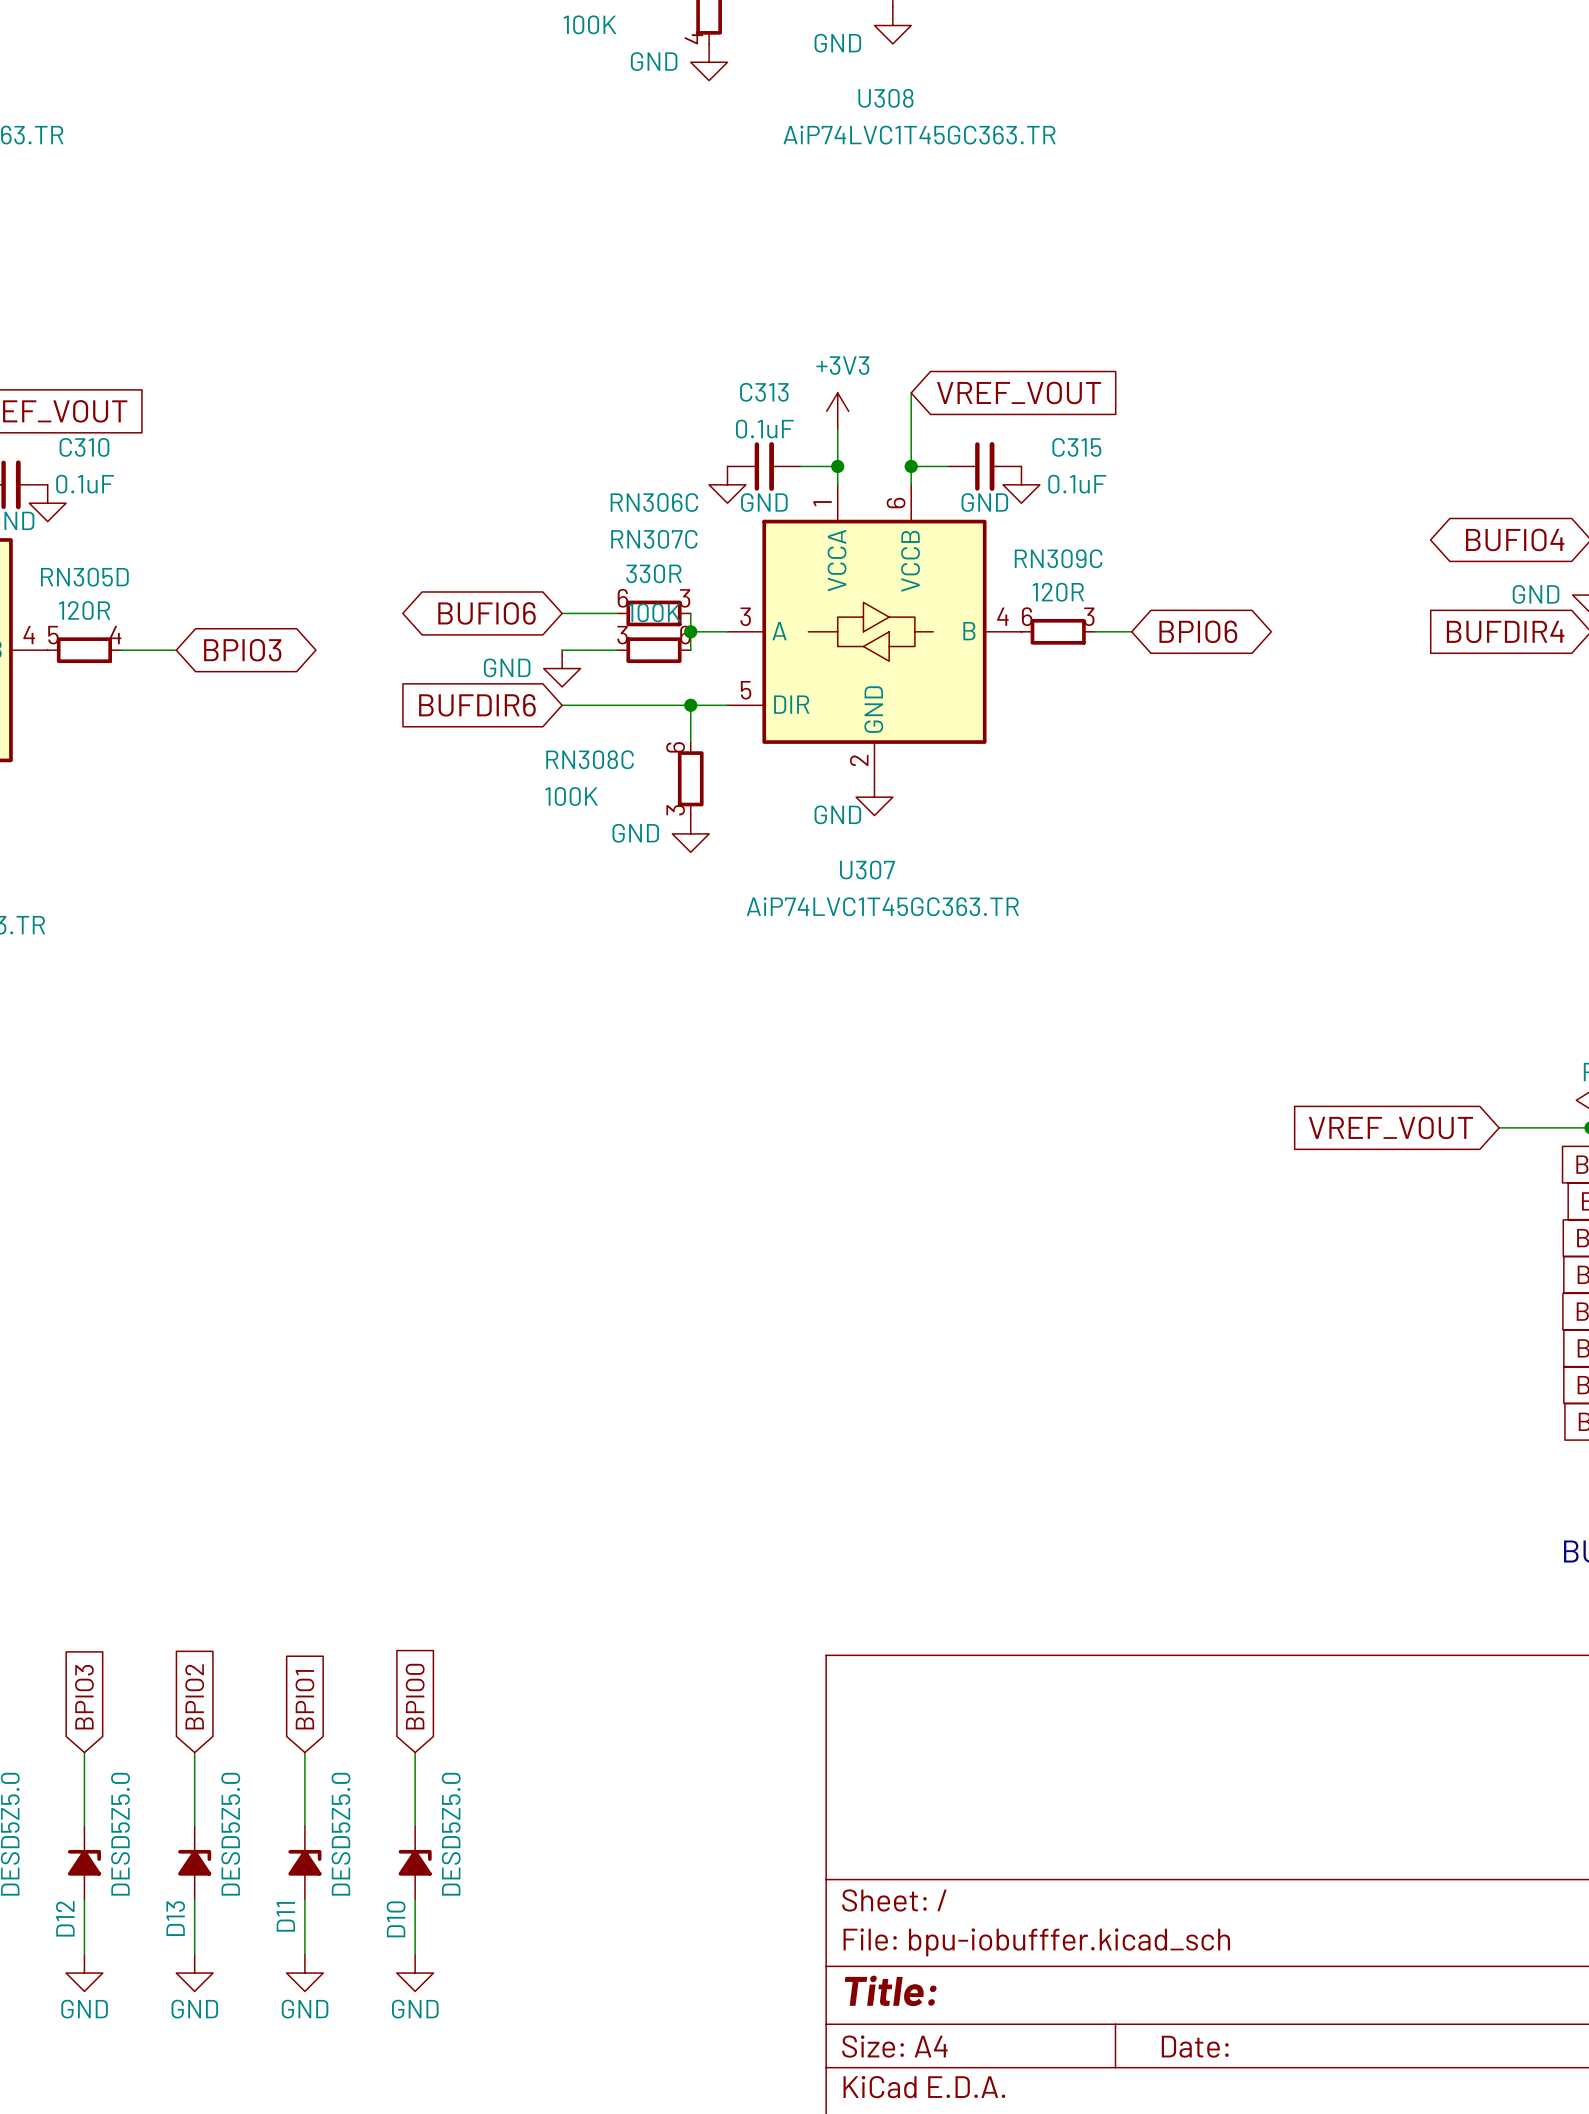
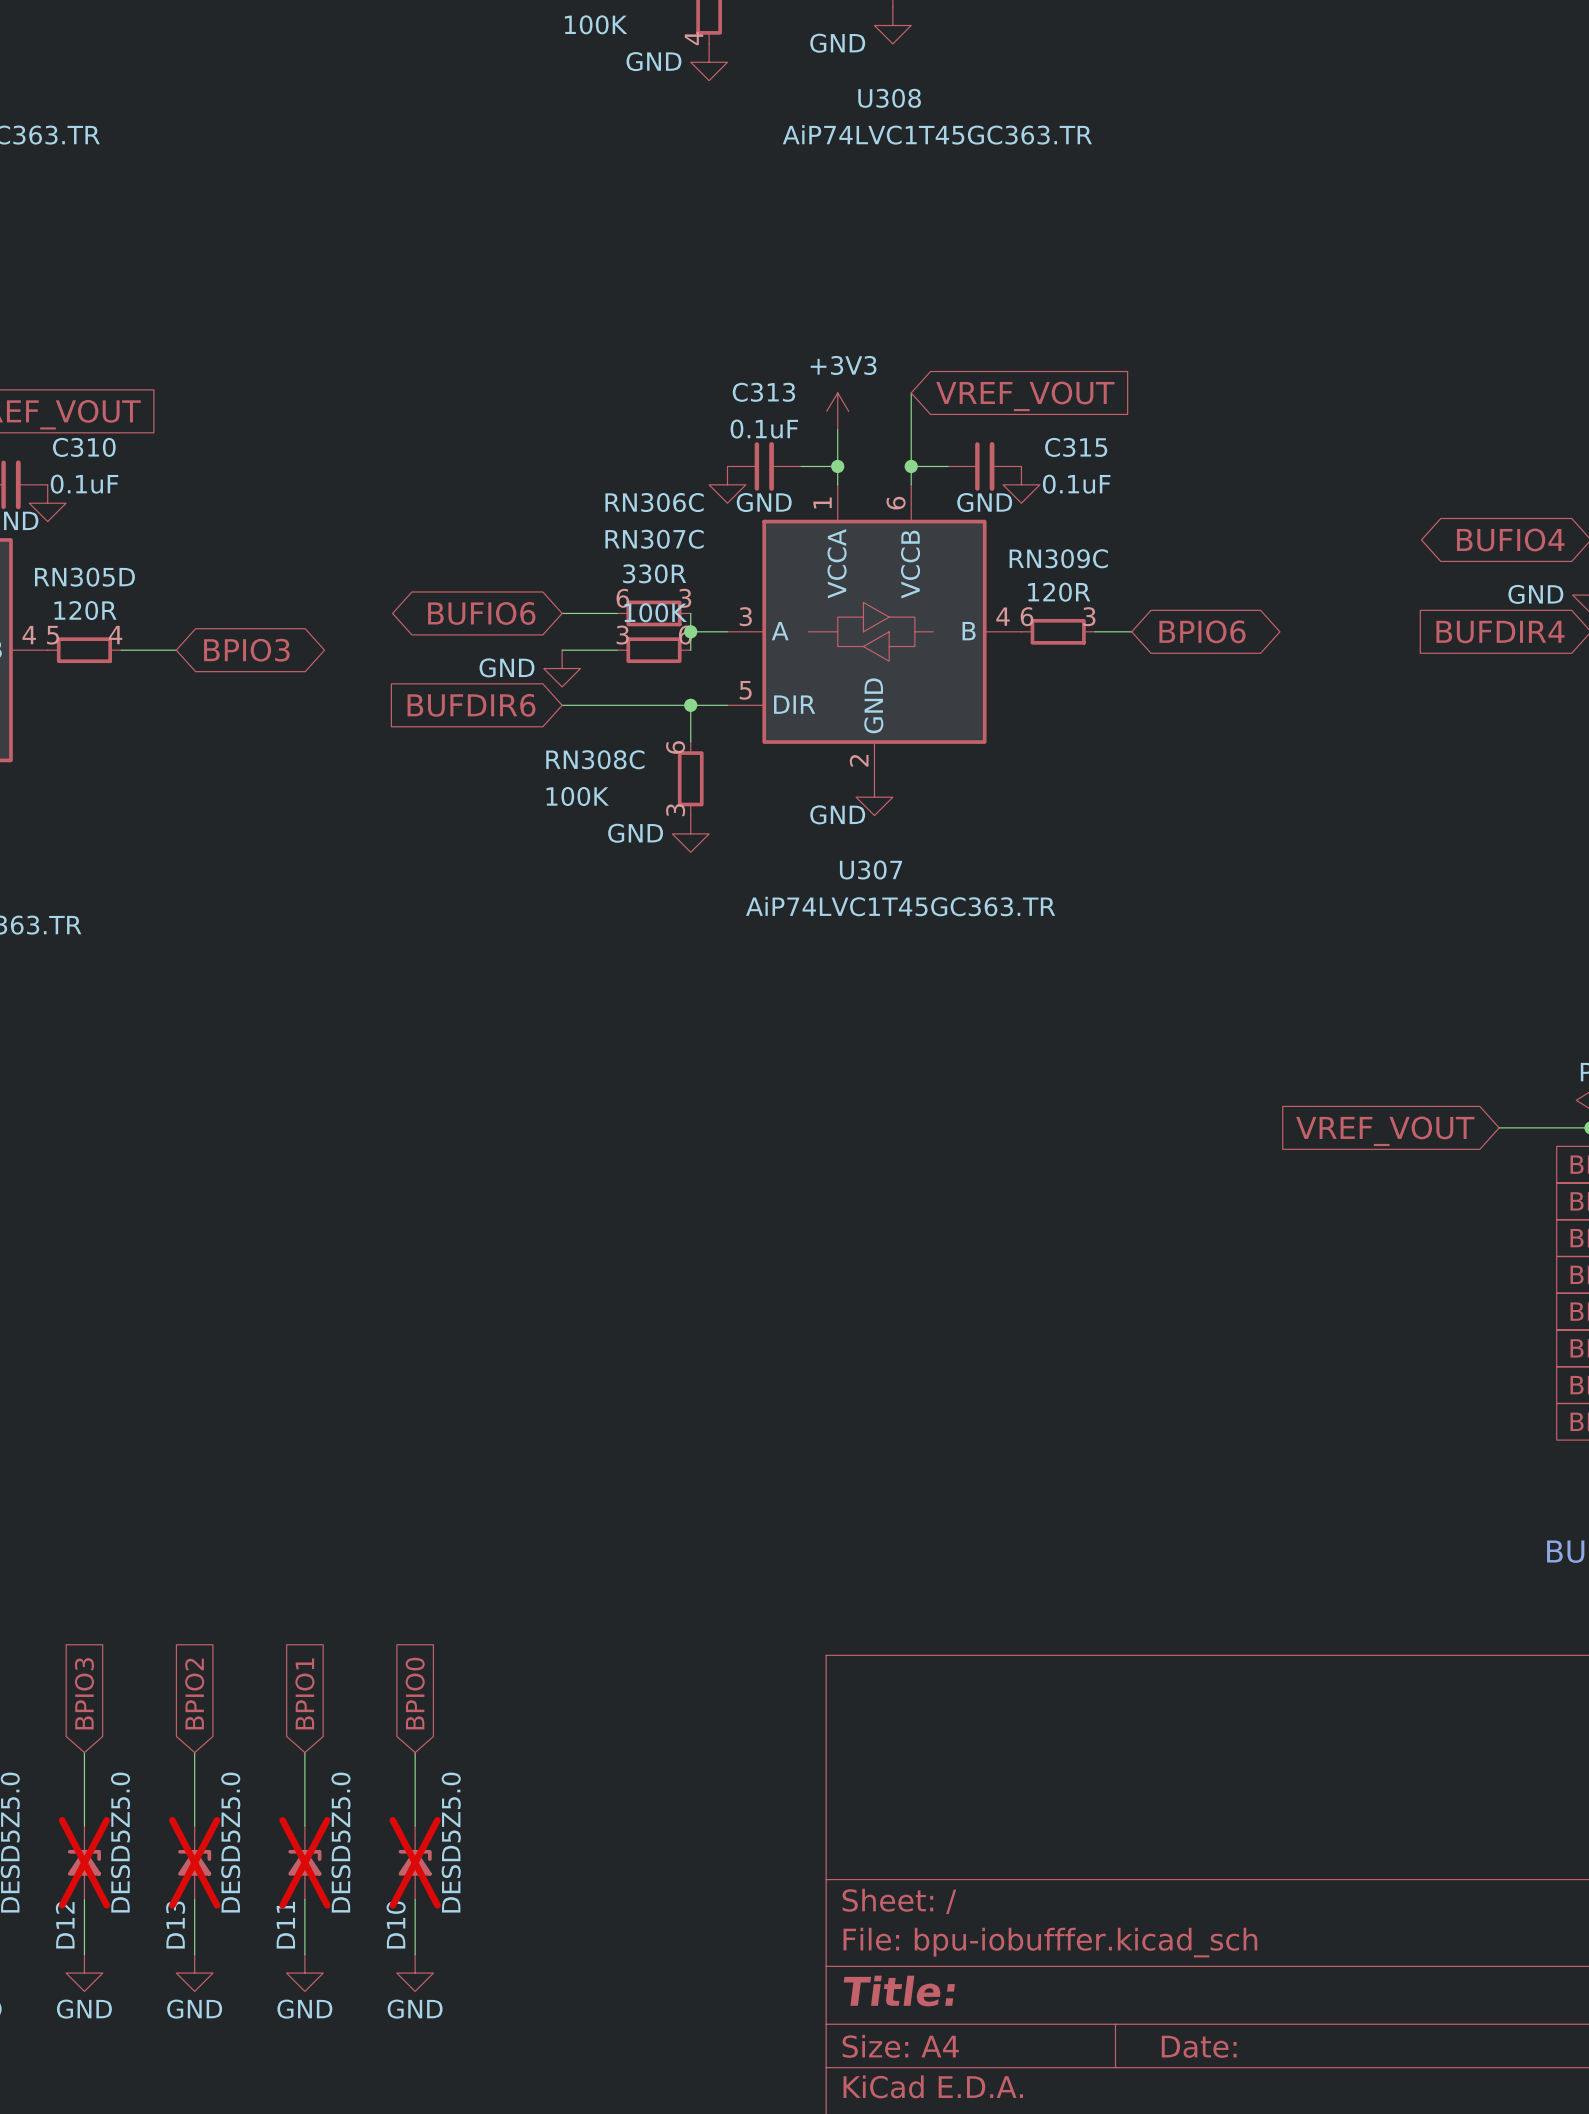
D12 do-not-place cross: none -> (84, 1862)
D13 do-not-place cross: none -> (194, 1862)
D11 do-not-place cross: none -> (304, 1862)
D10 do-not-place cross: none -> (415, 1862)

